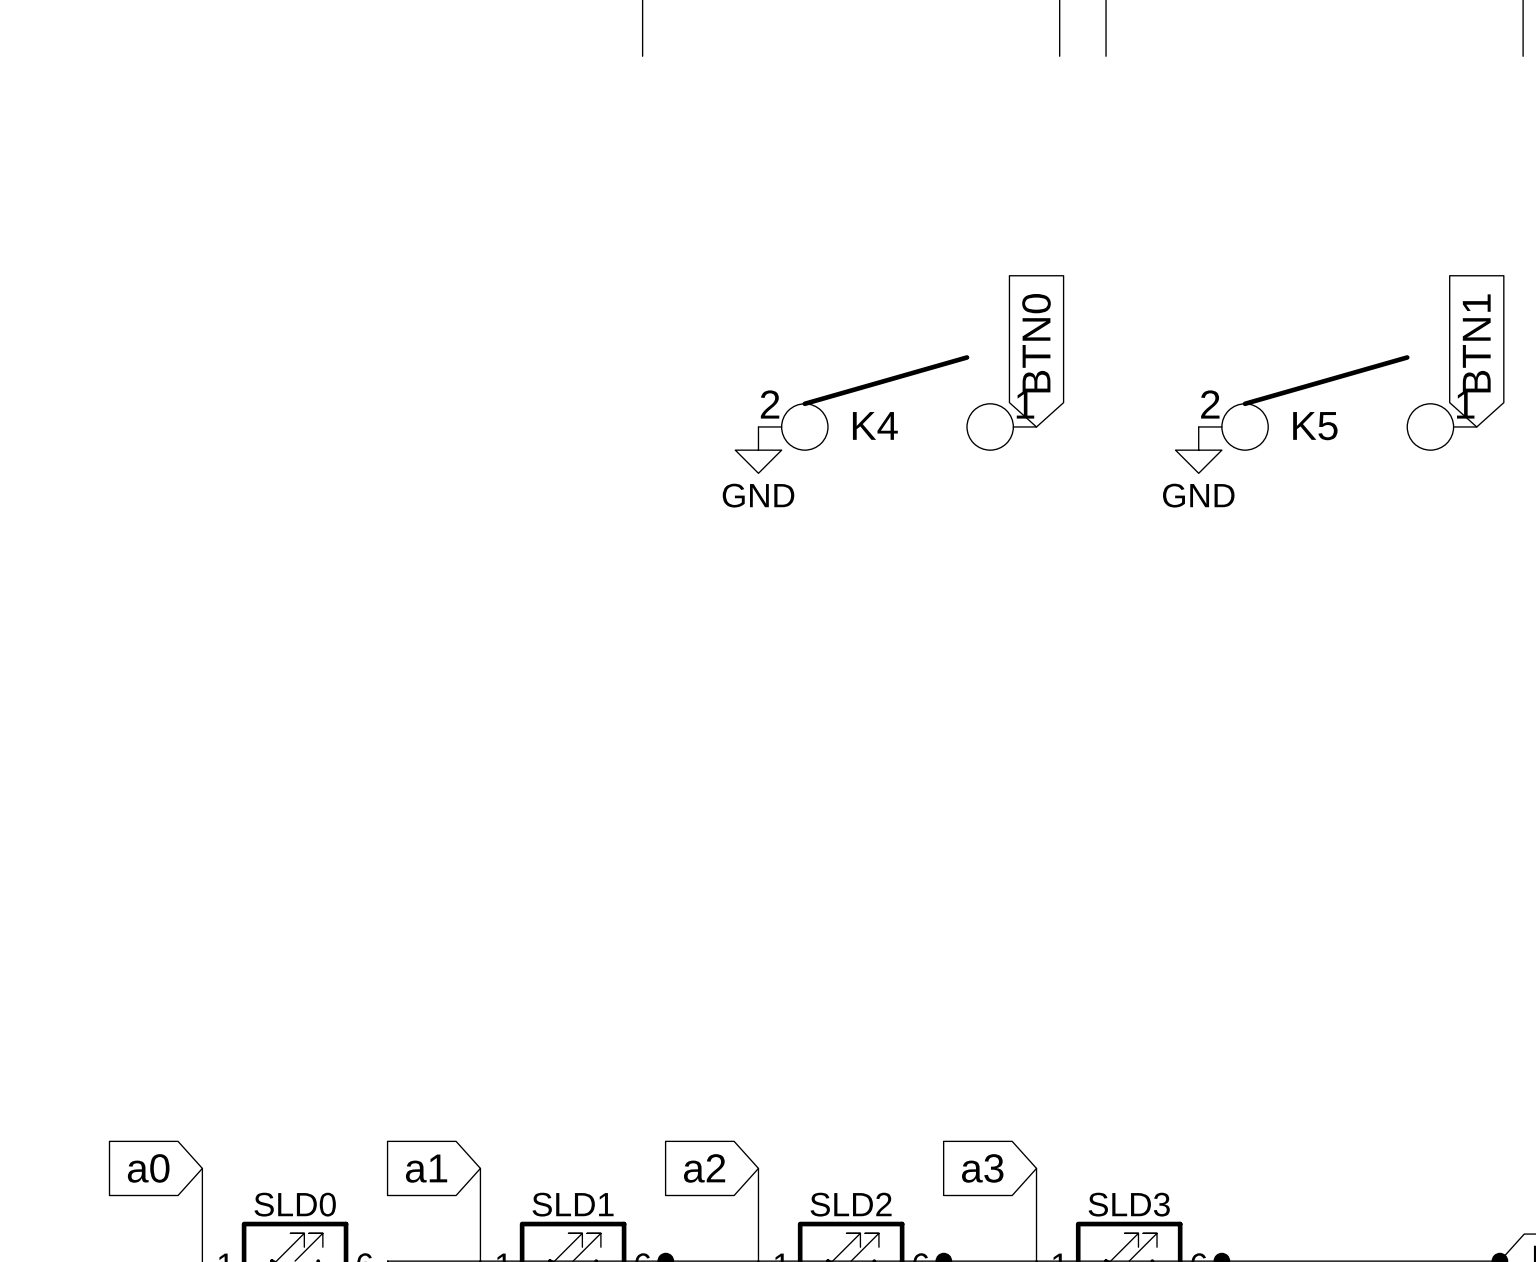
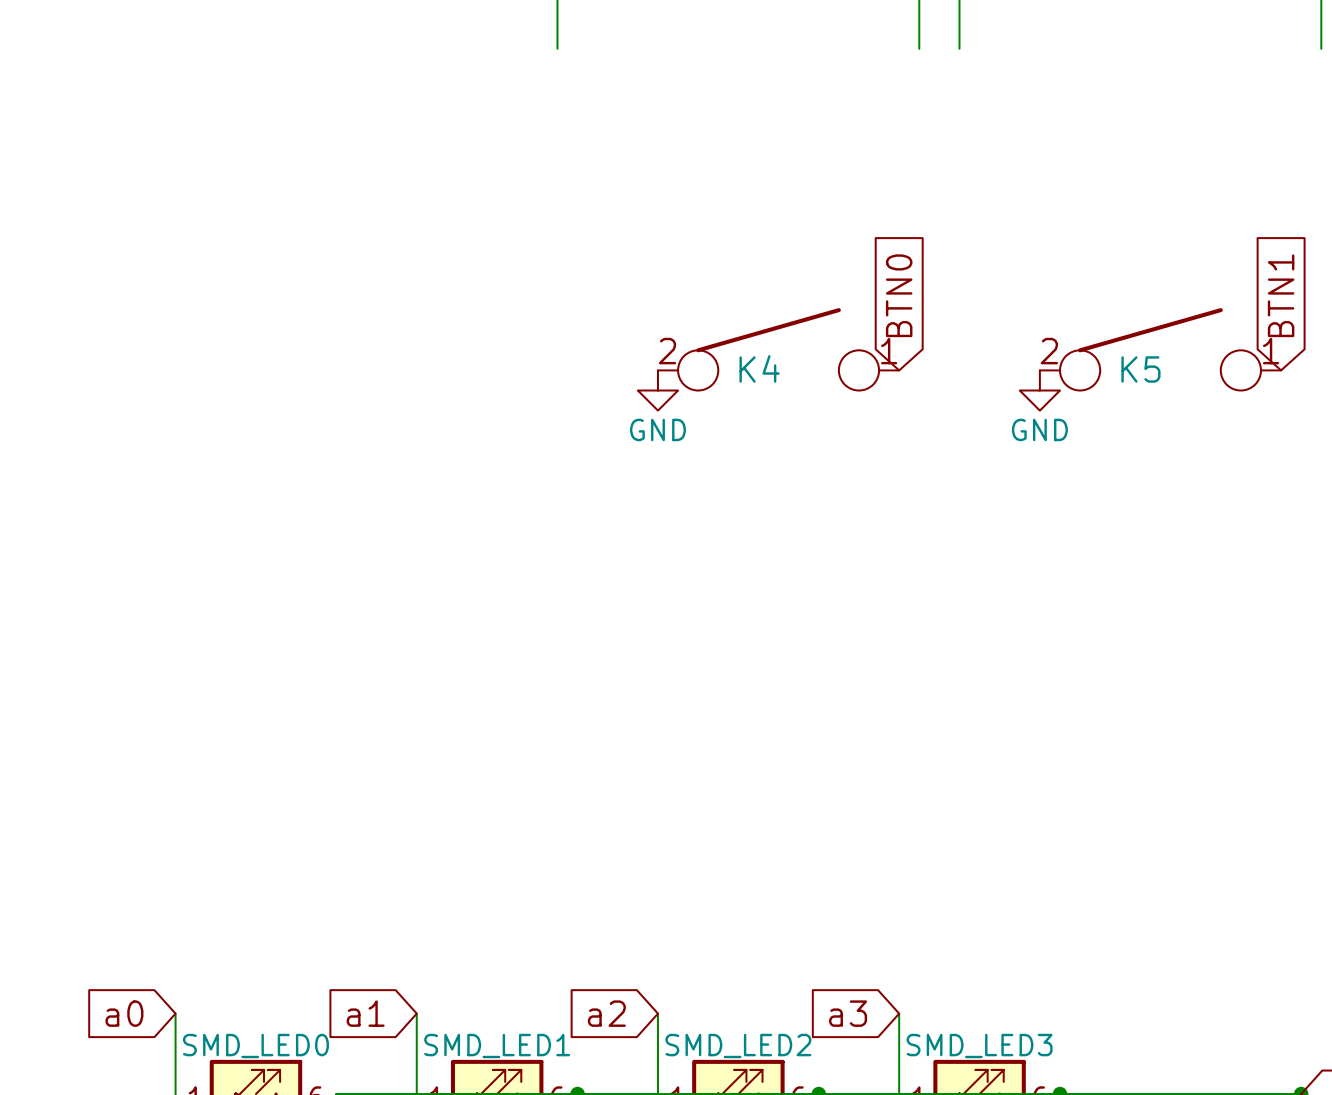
SLD0 name: SLD0 (295, 1204) -> SMD_LED0 (255, 1045)
SLD1 name: SLD1 (573, 1204) -> SMD_LED1 (497, 1045)
SLD2 name: SLD2 (851, 1204) -> SMD_LED2 (738, 1045)
SLD3 name: SLD3 (1129, 1204) -> SMD_LED3 (979, 1045)

